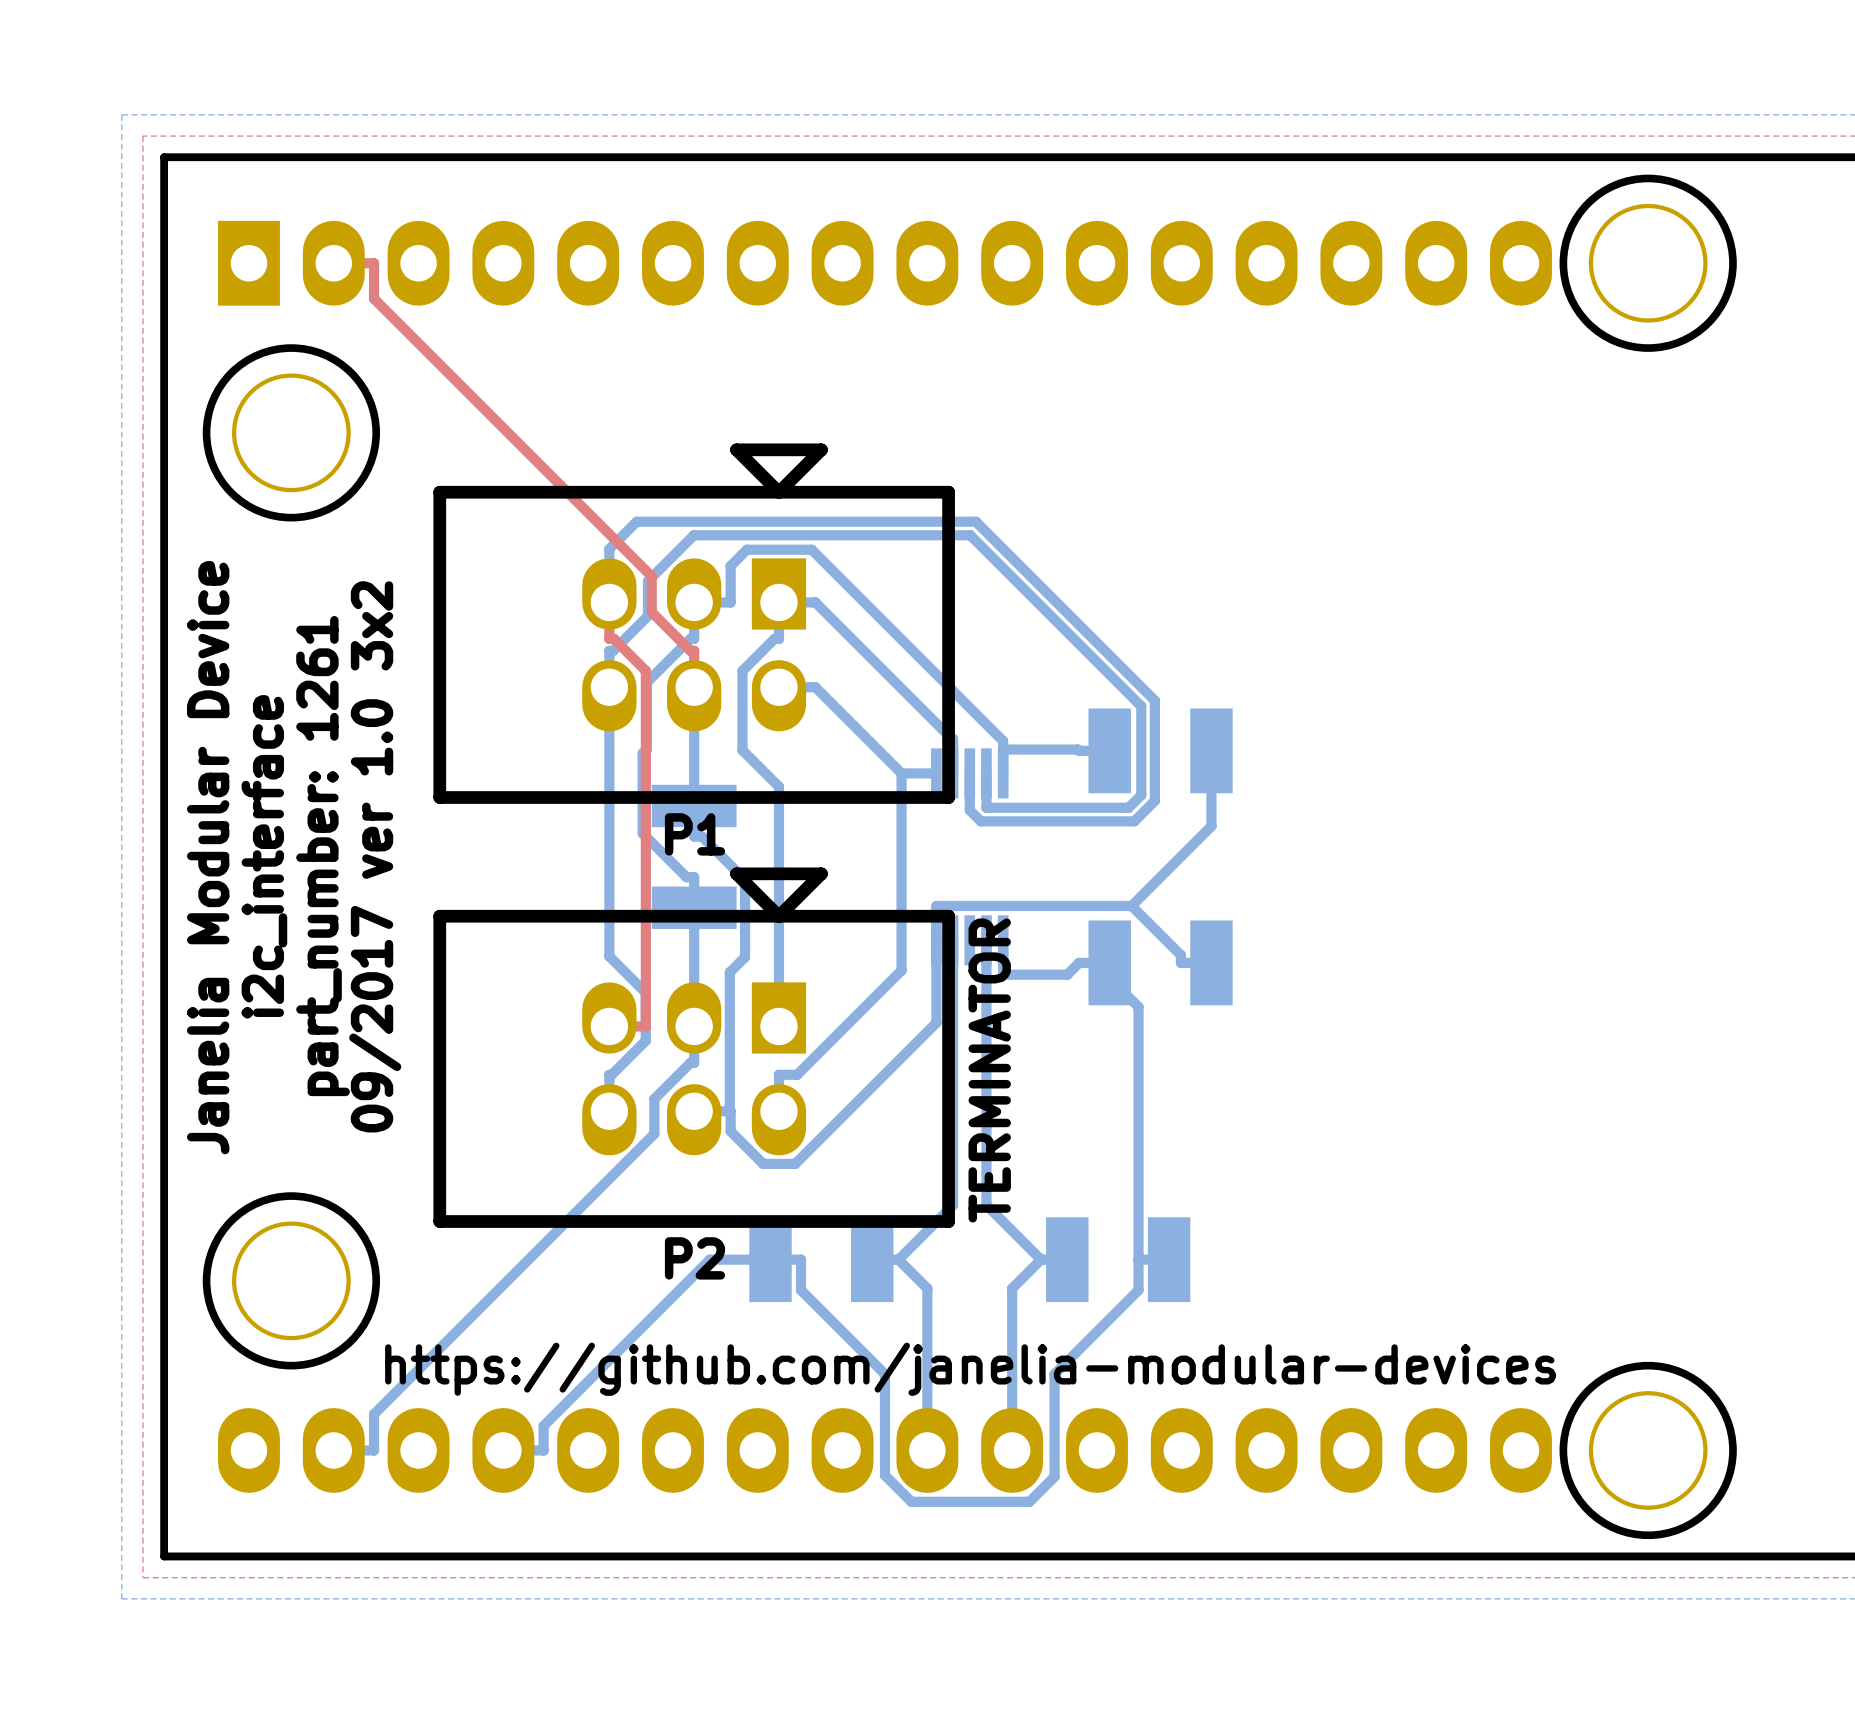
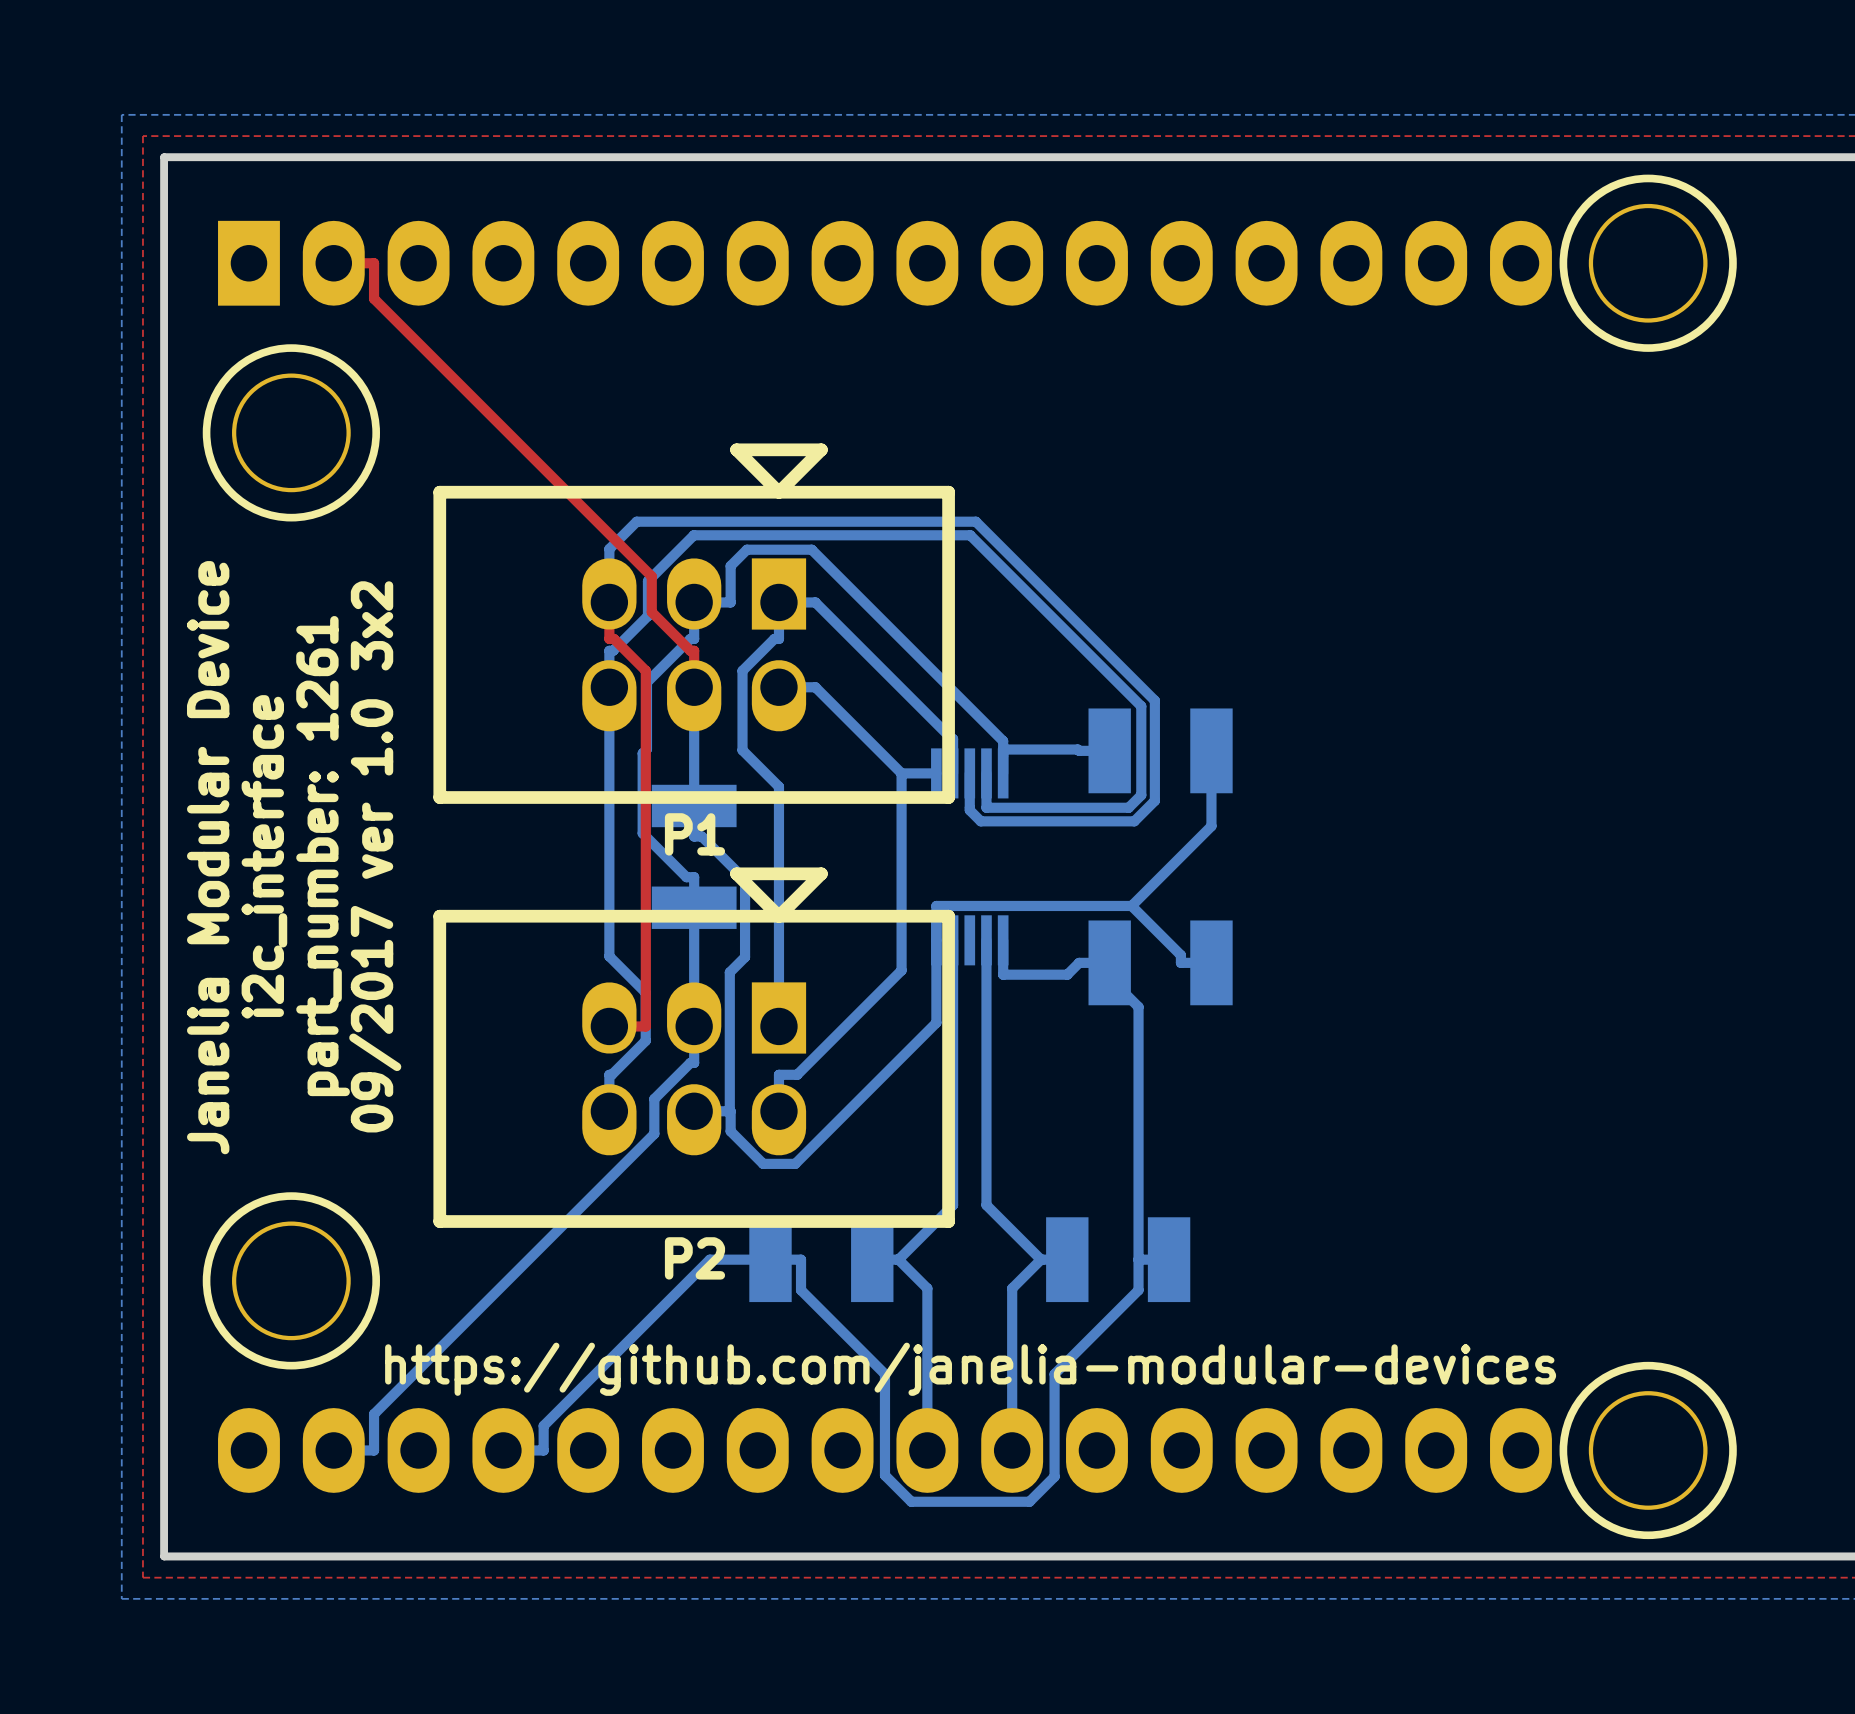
text: TERMINATOR (989, 1070) -> none

